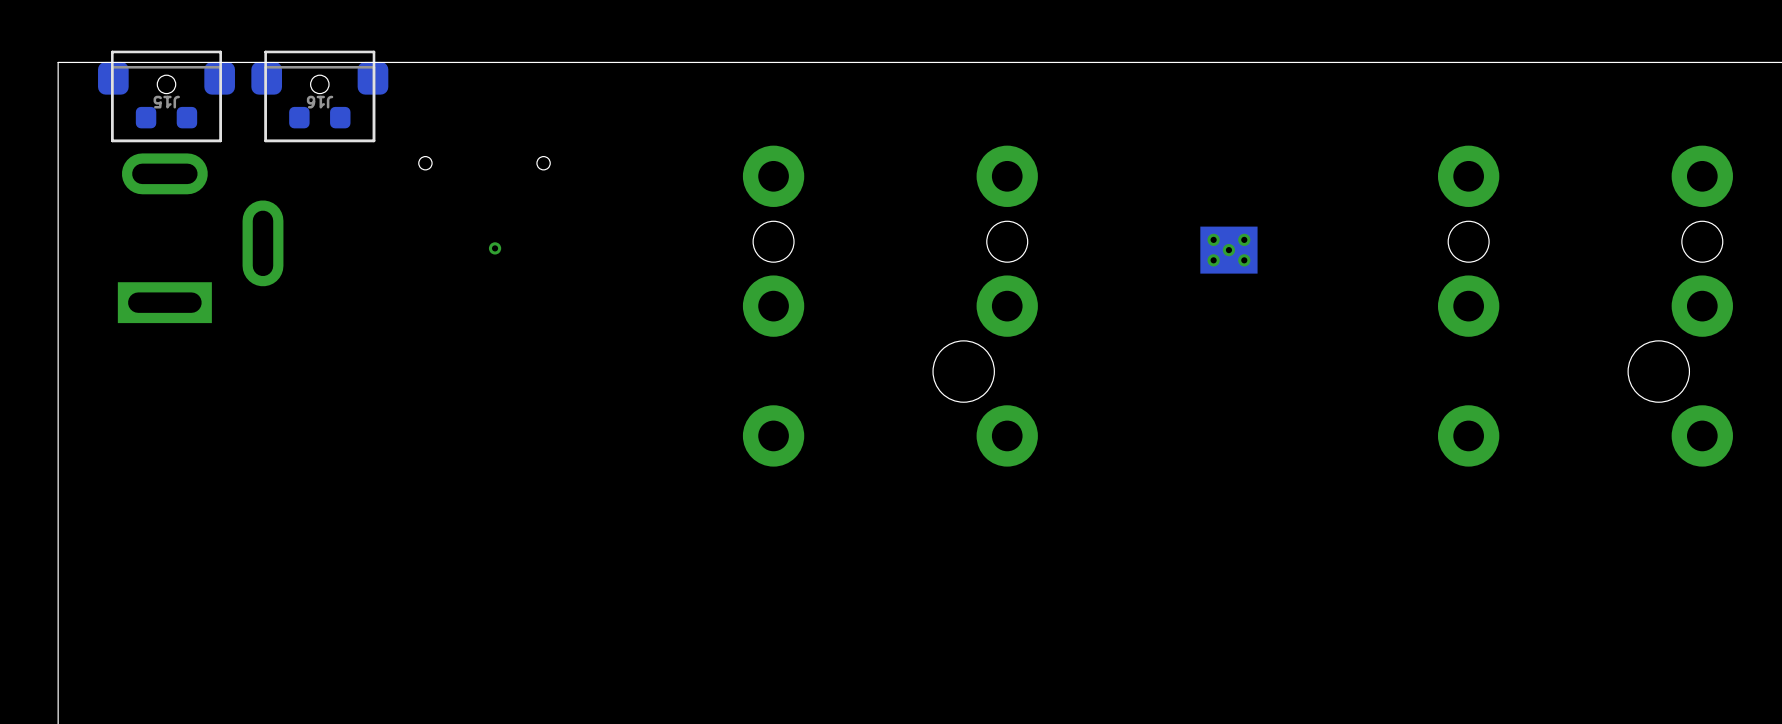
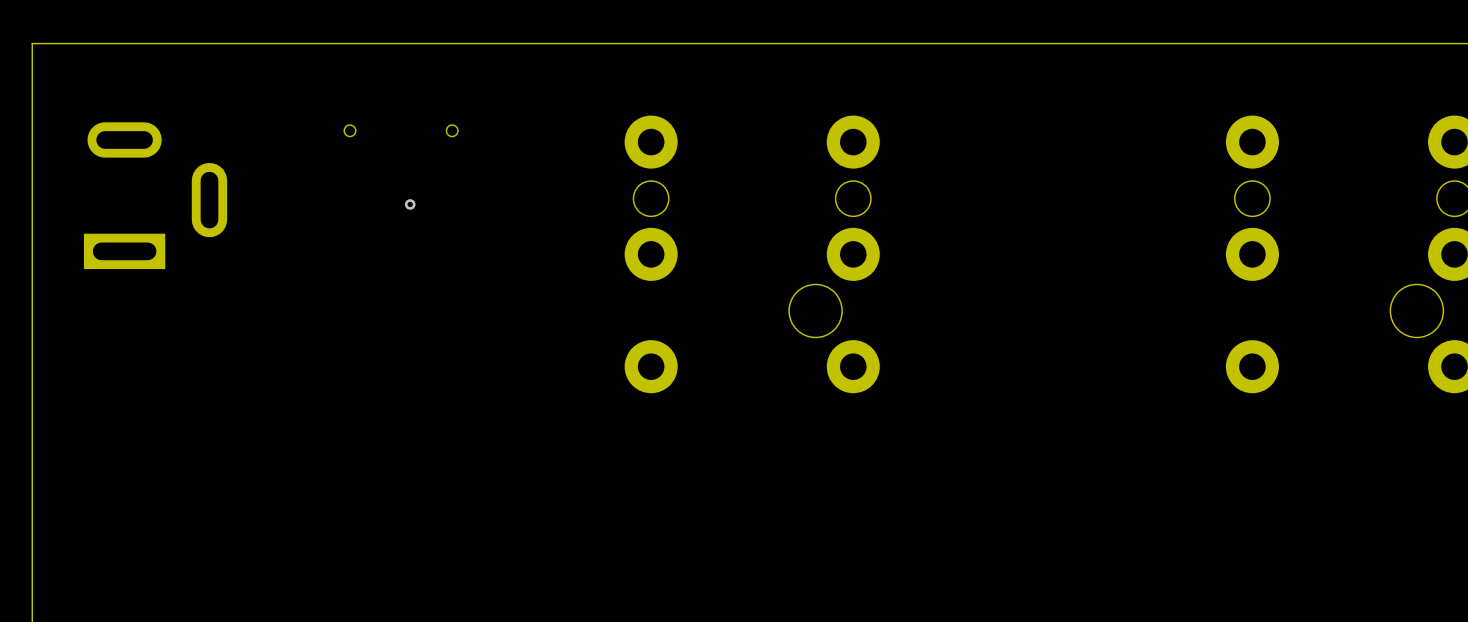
J15: (166, 96) -> none
J16: (319, 96) -> none
part: (1228, 250) -> none

